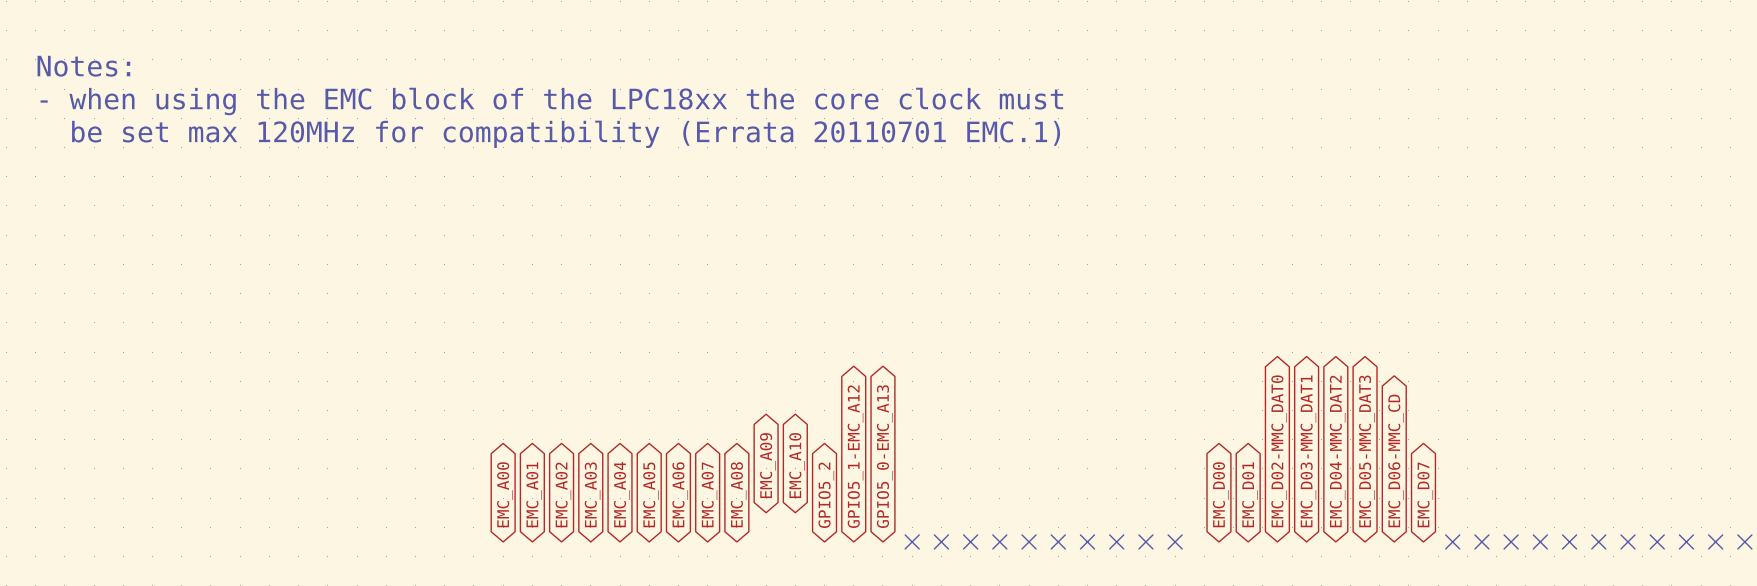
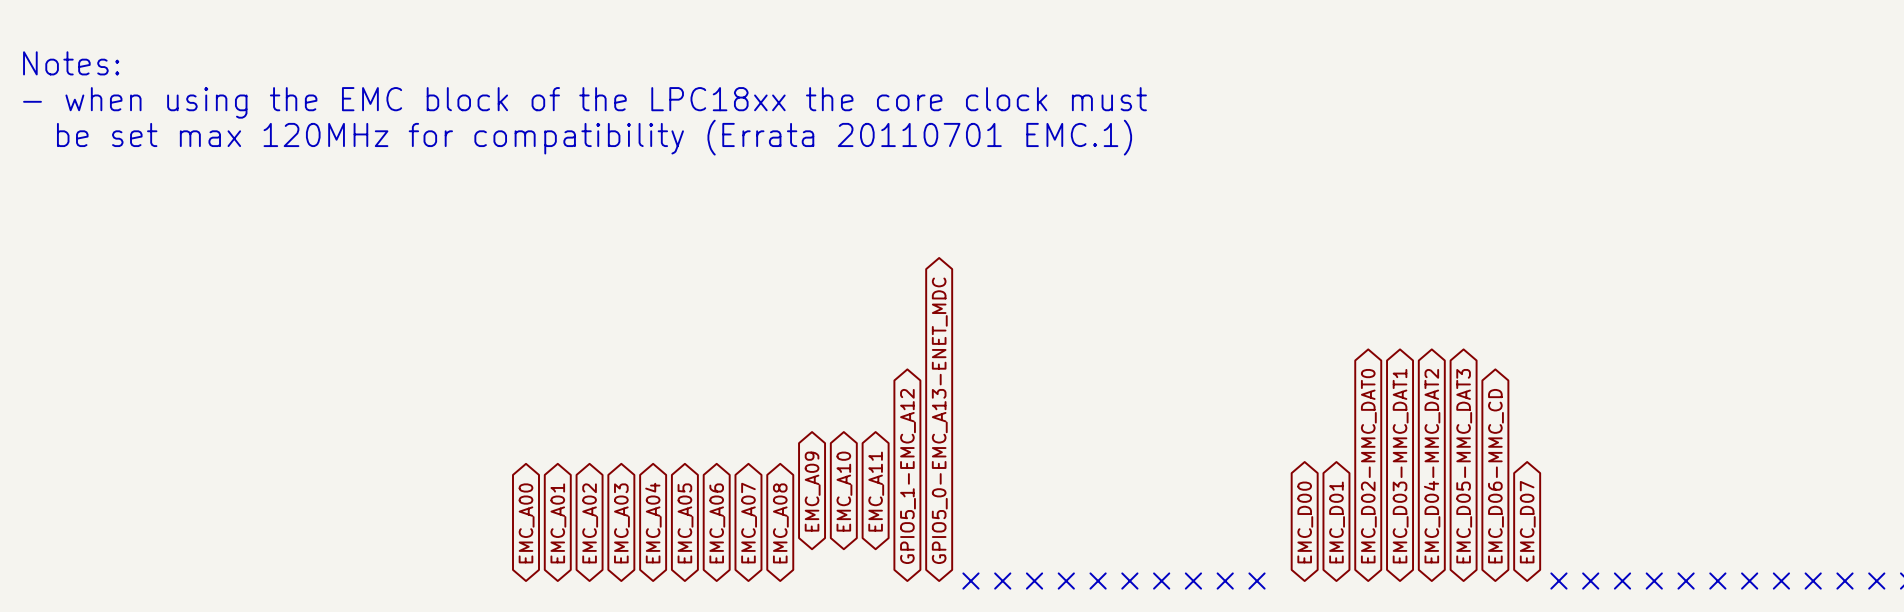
global label: GPIO5_0-EMC_A13 (884, 456) -> GPIO5_0-EMC_A13-ENET_MDC (939, 420)
global label: none -> EMC_A11 (876, 491)
global label: GPIO5_2 (826, 495) -> none

